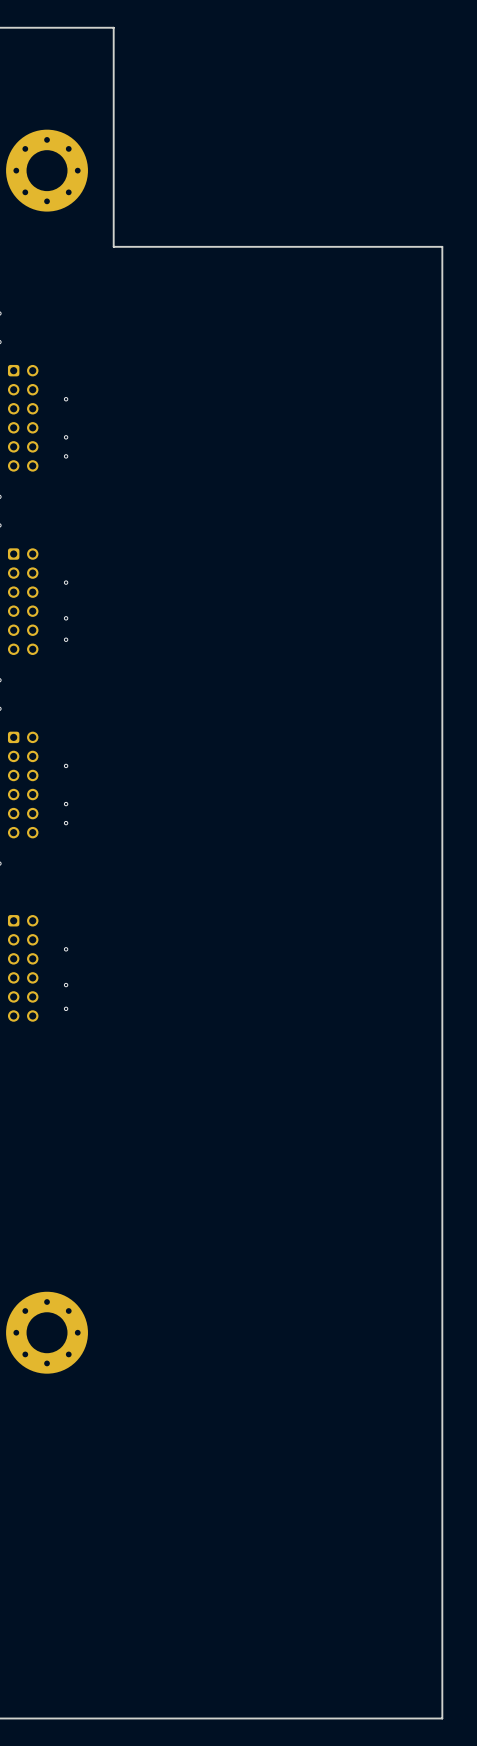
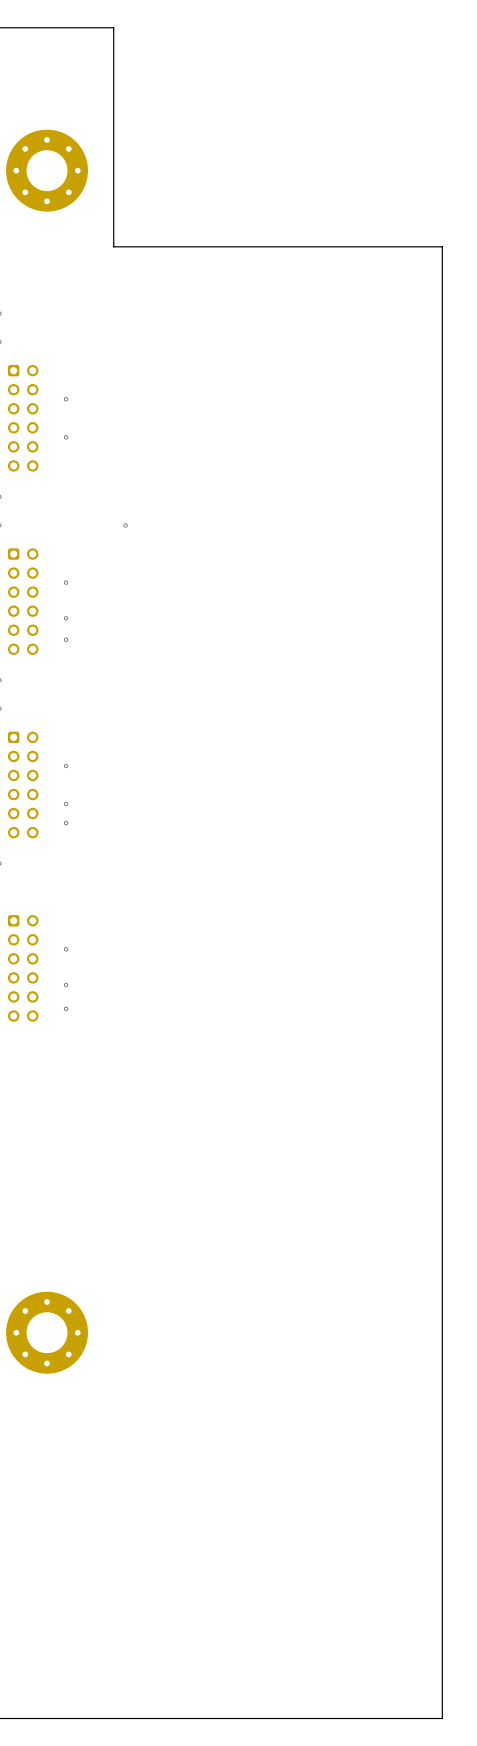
via: (66, 456) -> none
via: none -> (125, 525)

